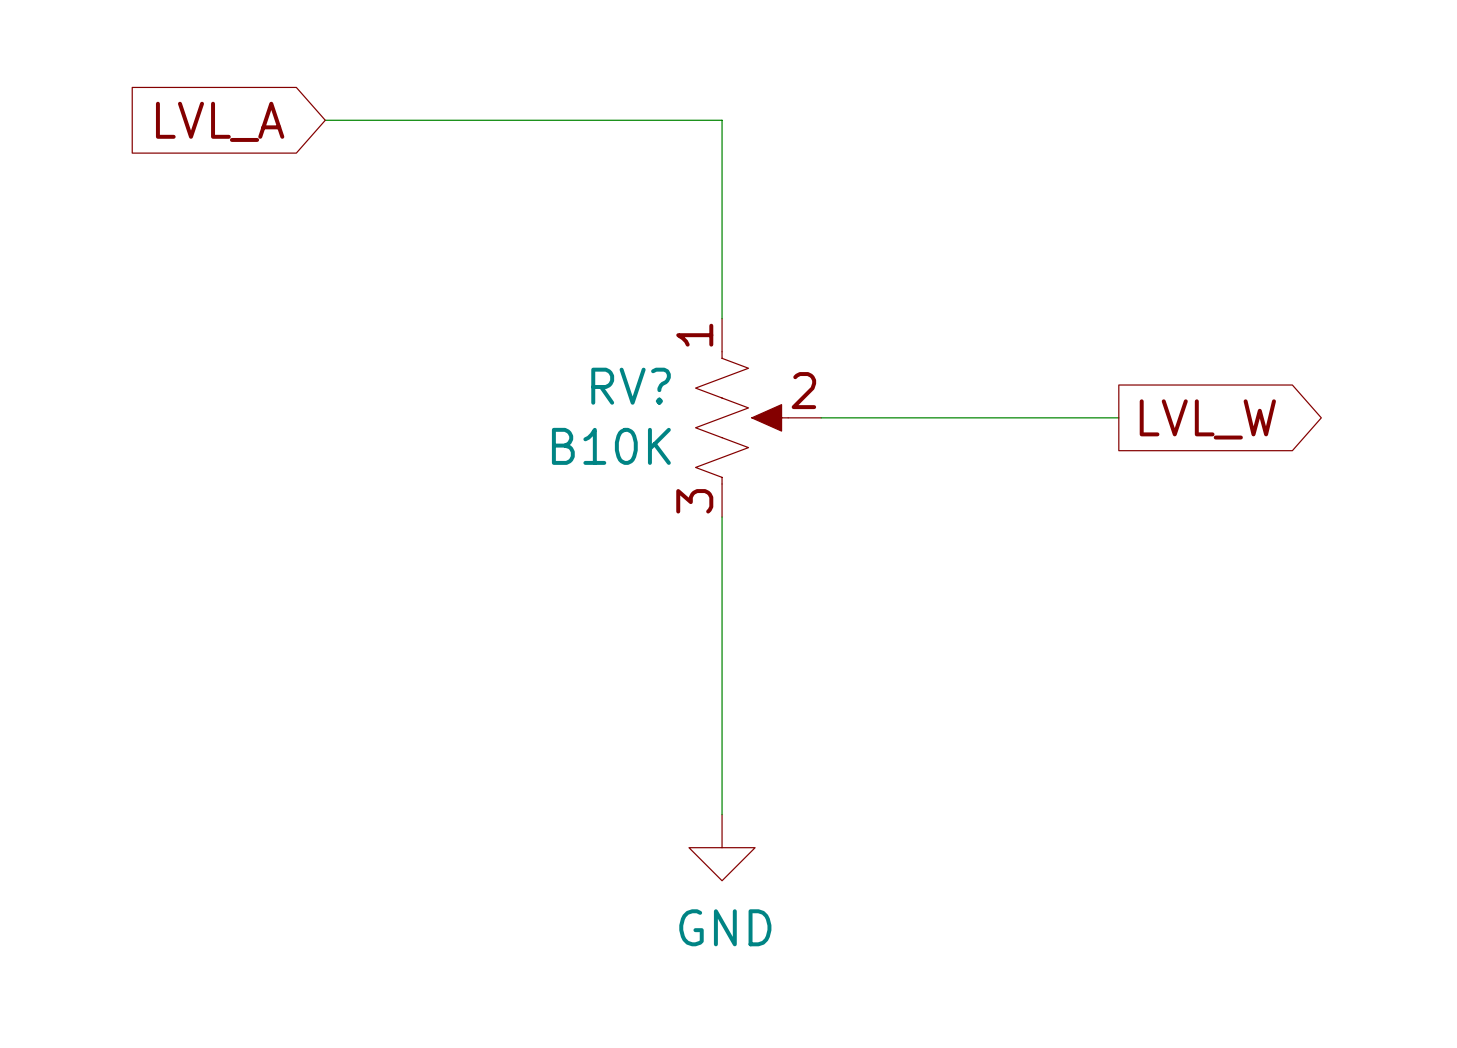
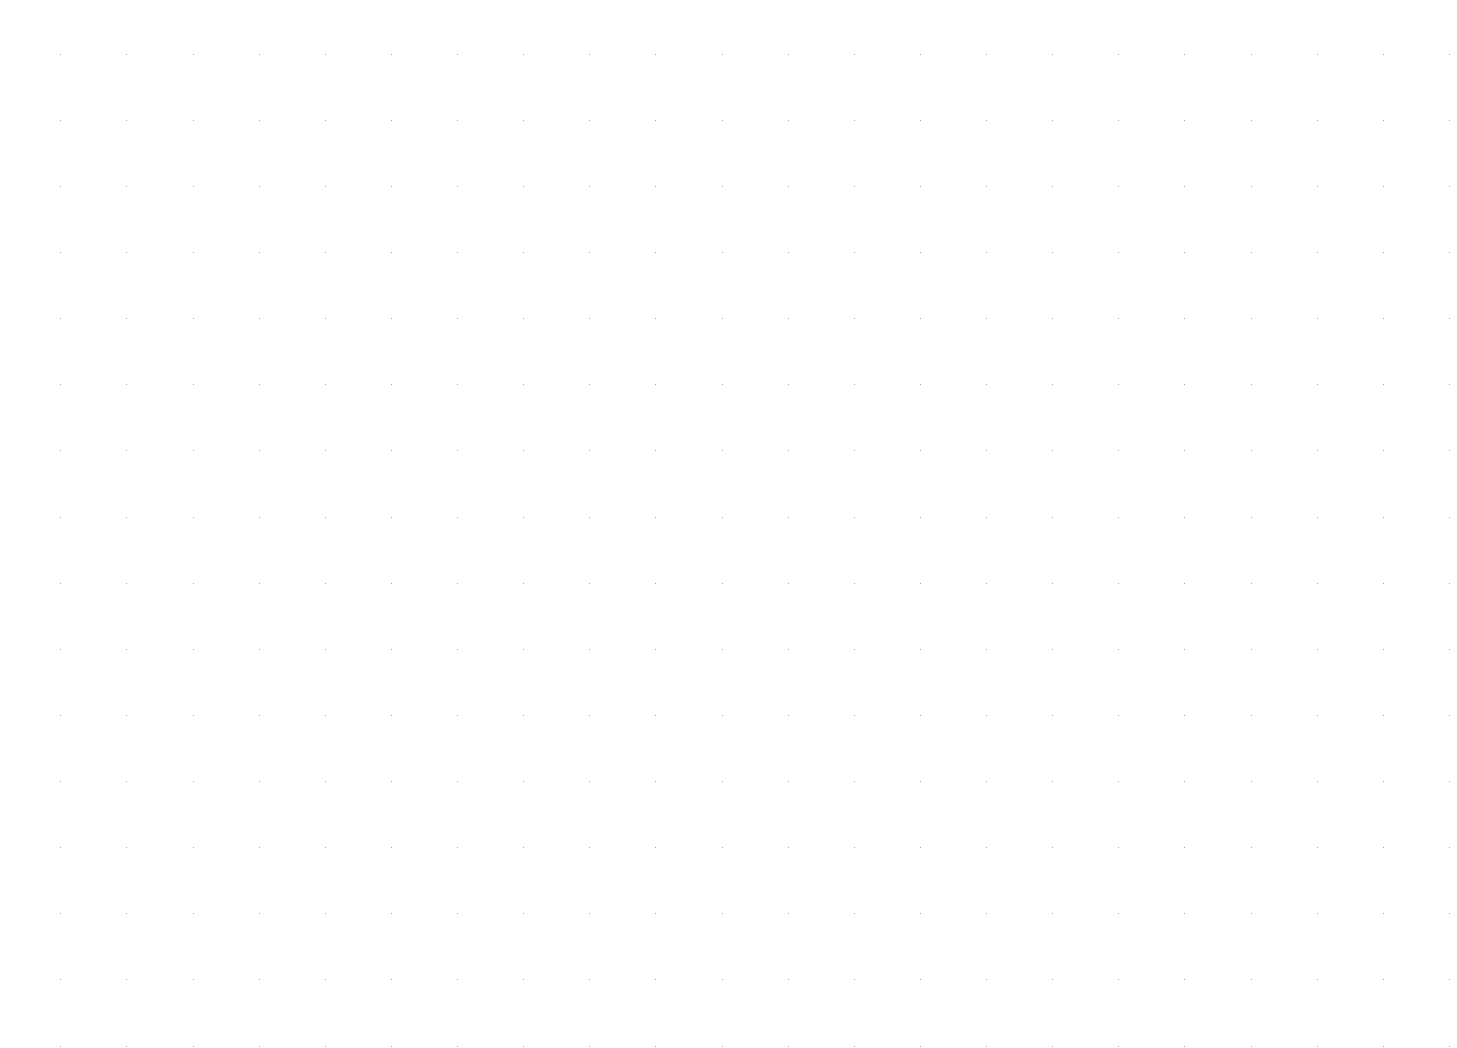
wire: (325, 120) (722, 120) (722, 318) -> none
global label: LVL_A (220, 121) -> none
RV?: B10K (758, 417) -> none
wire: (821, 417) (1118, 417) -> none
global label: LVL_W (1207, 419) -> none
wire: (722, 517) (722, 814) -> none
power symbol: GND (722, 847) -> none

